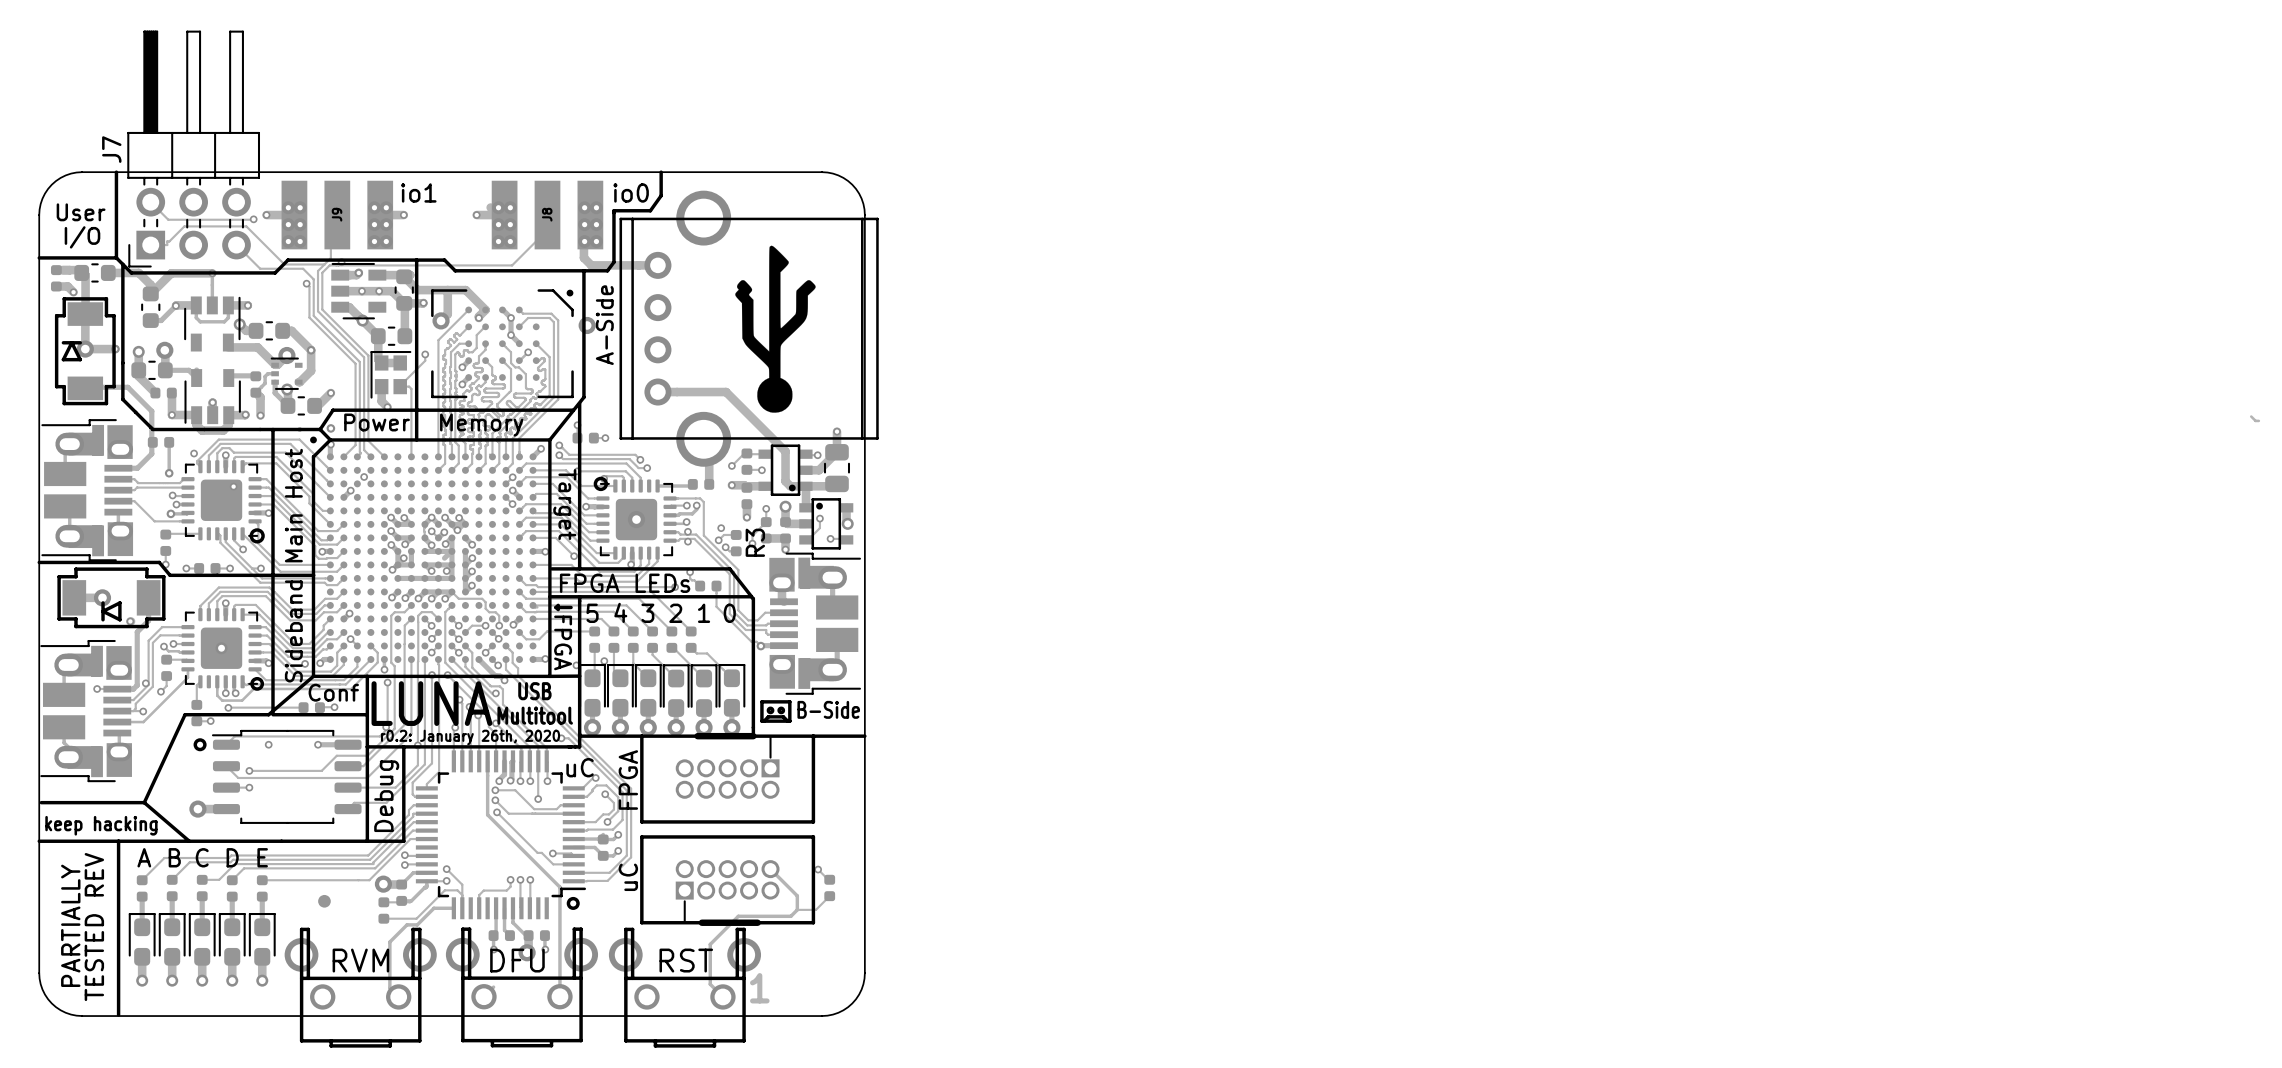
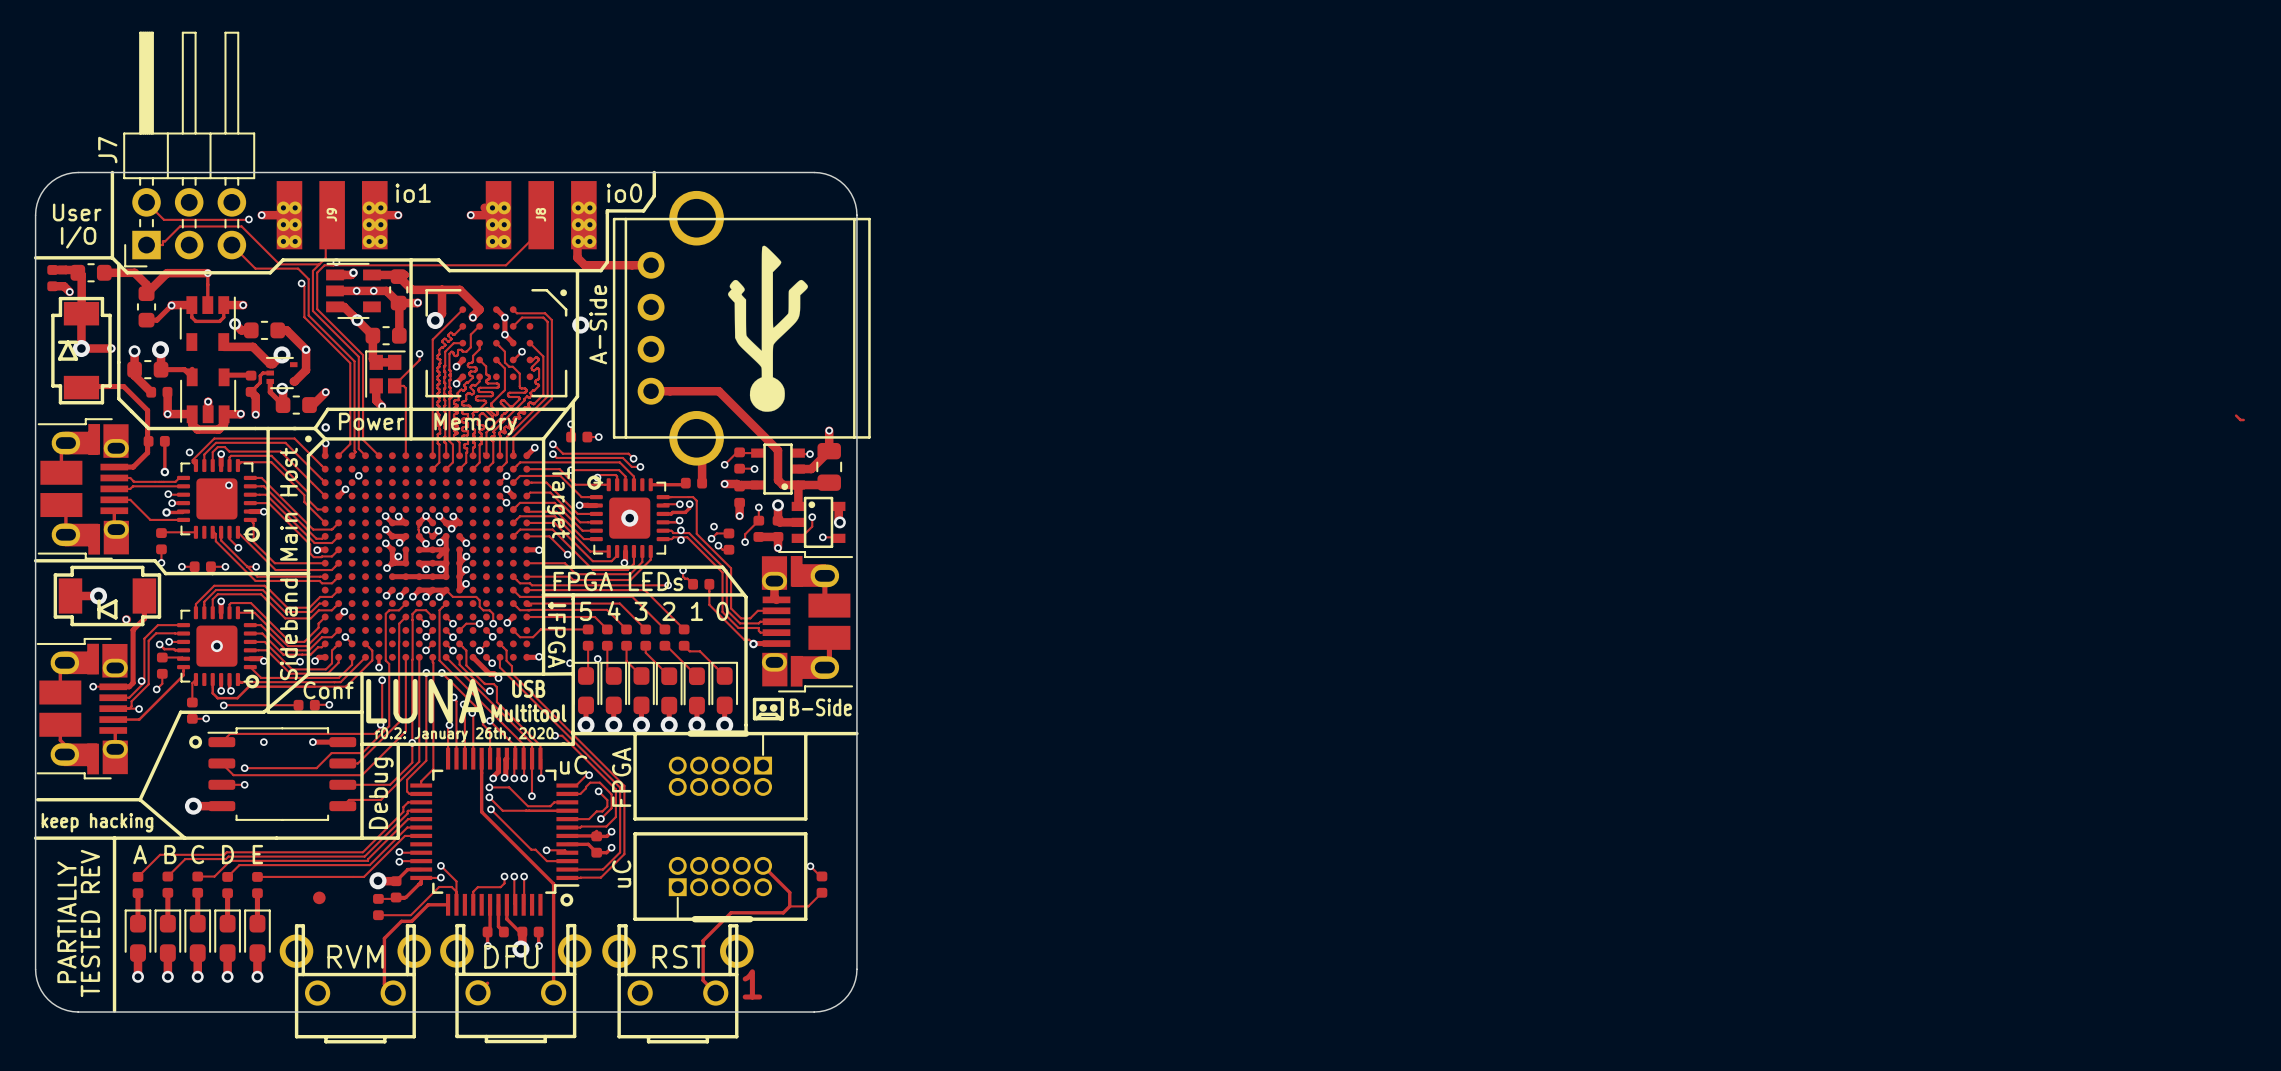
R3 name: R3 (755, 542) -> none

